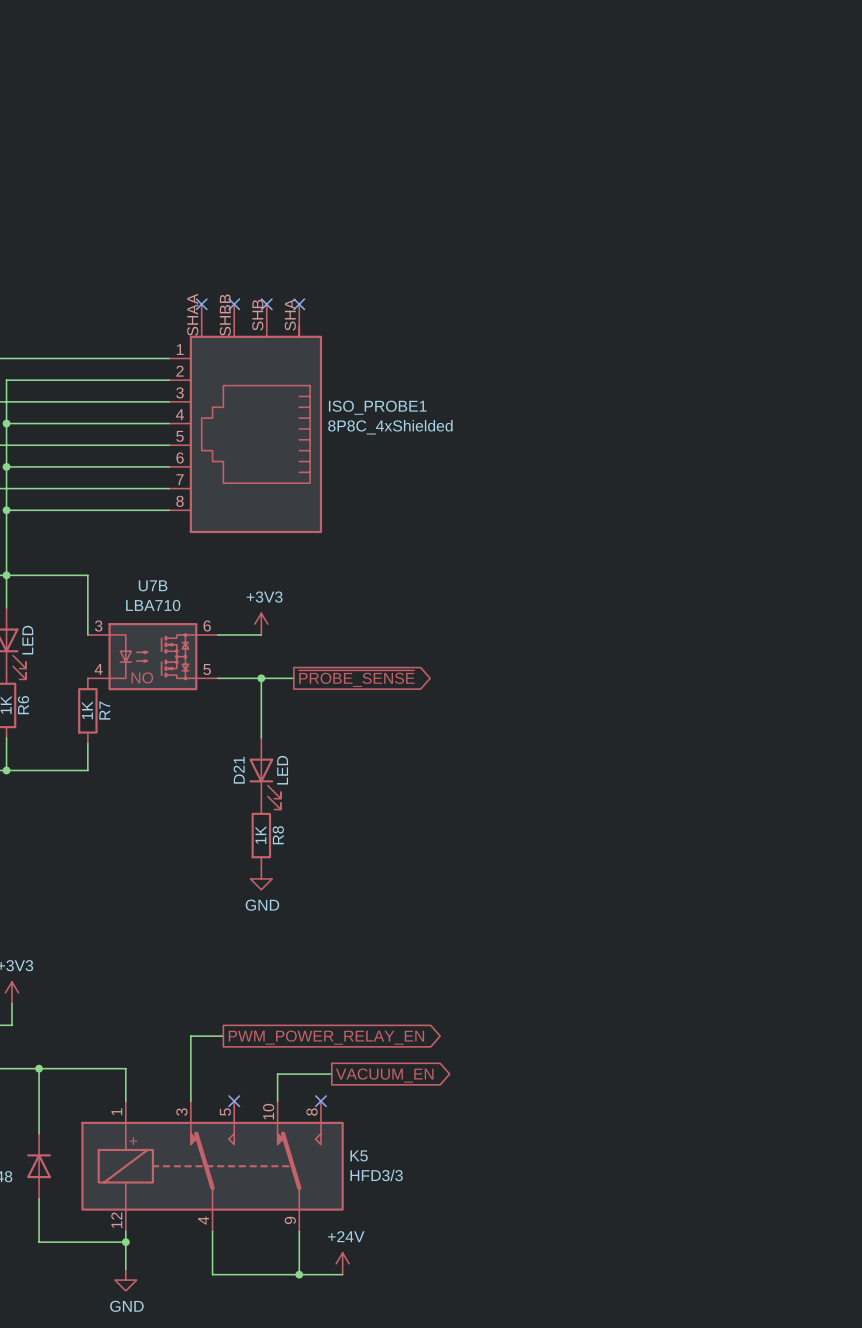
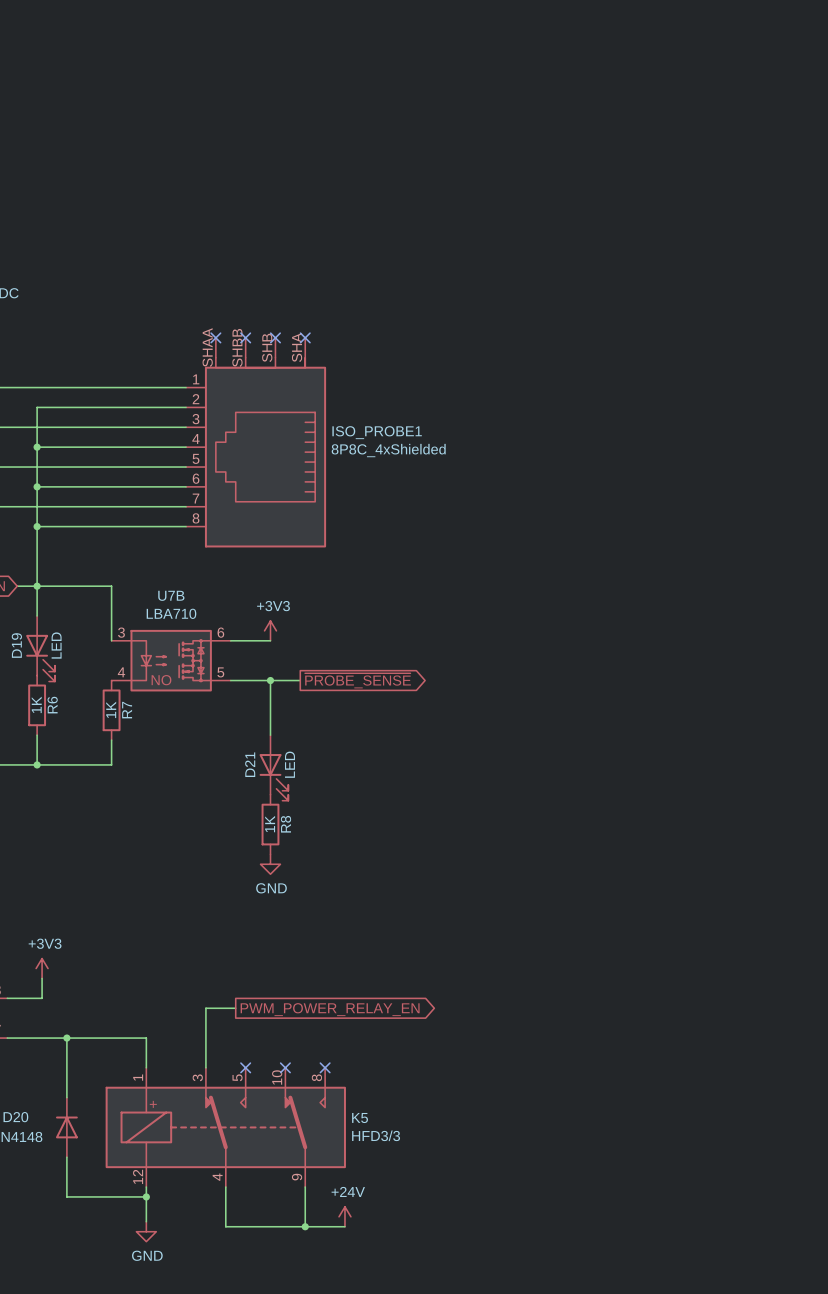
wire: (331, 1074) (277, 1074) (277, 1101) -> none
global label: VACUUM_EN (384, 1075) -> none
no-connect mark: none -> (285, 1067)

